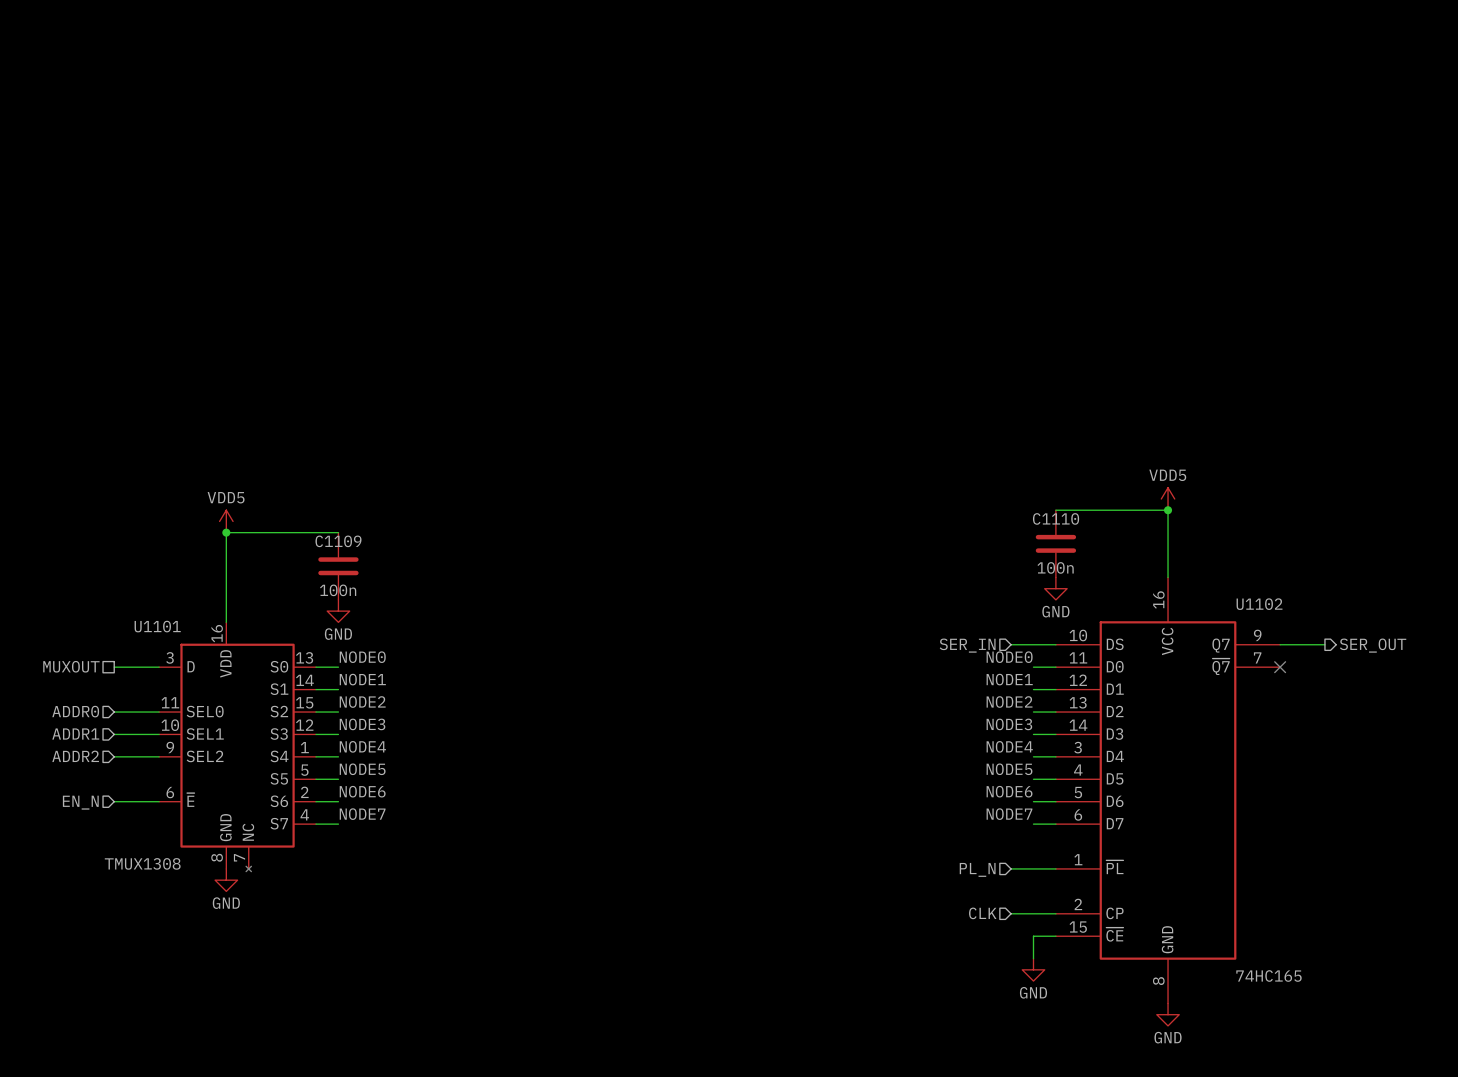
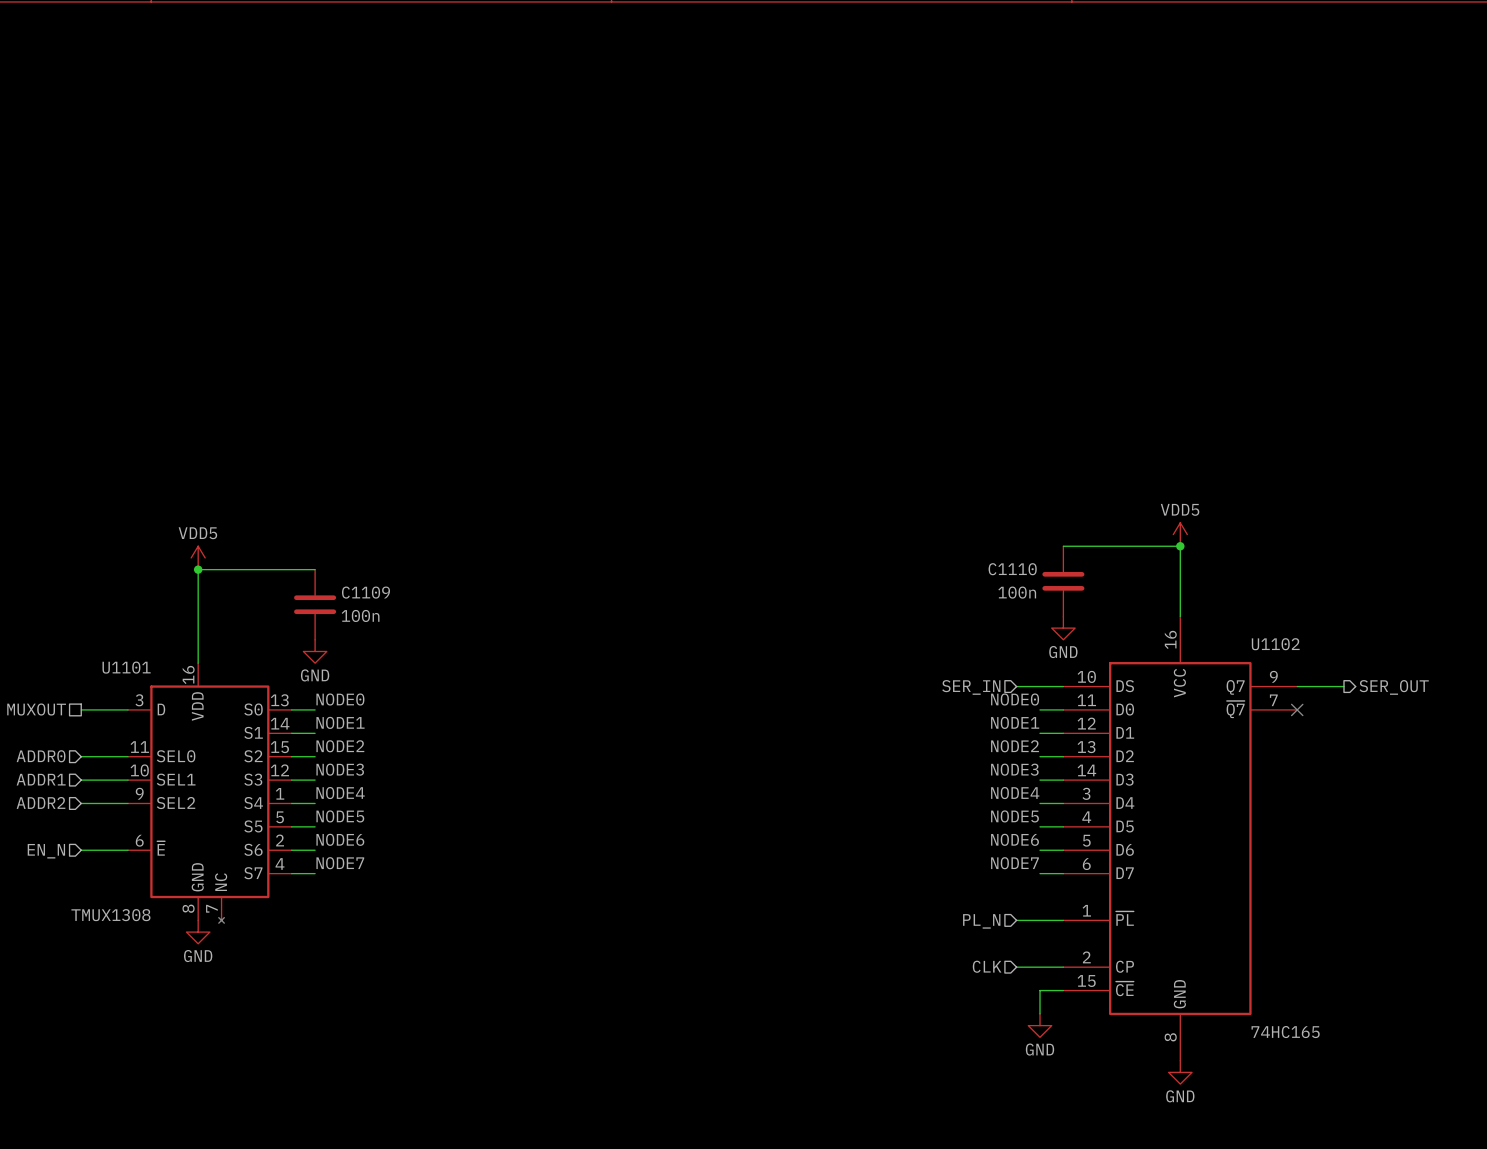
C1110 name position: C1110 (1056, 518) -> C1110 (1012, 569)
C1109 name position: C1109 (338, 541) -> C1109 (365, 592)
C1110 value position: 100n (1055, 567) -> 100n (1017, 592)
C1109 value position: 100n (338, 590) -> 100n (360, 615)

